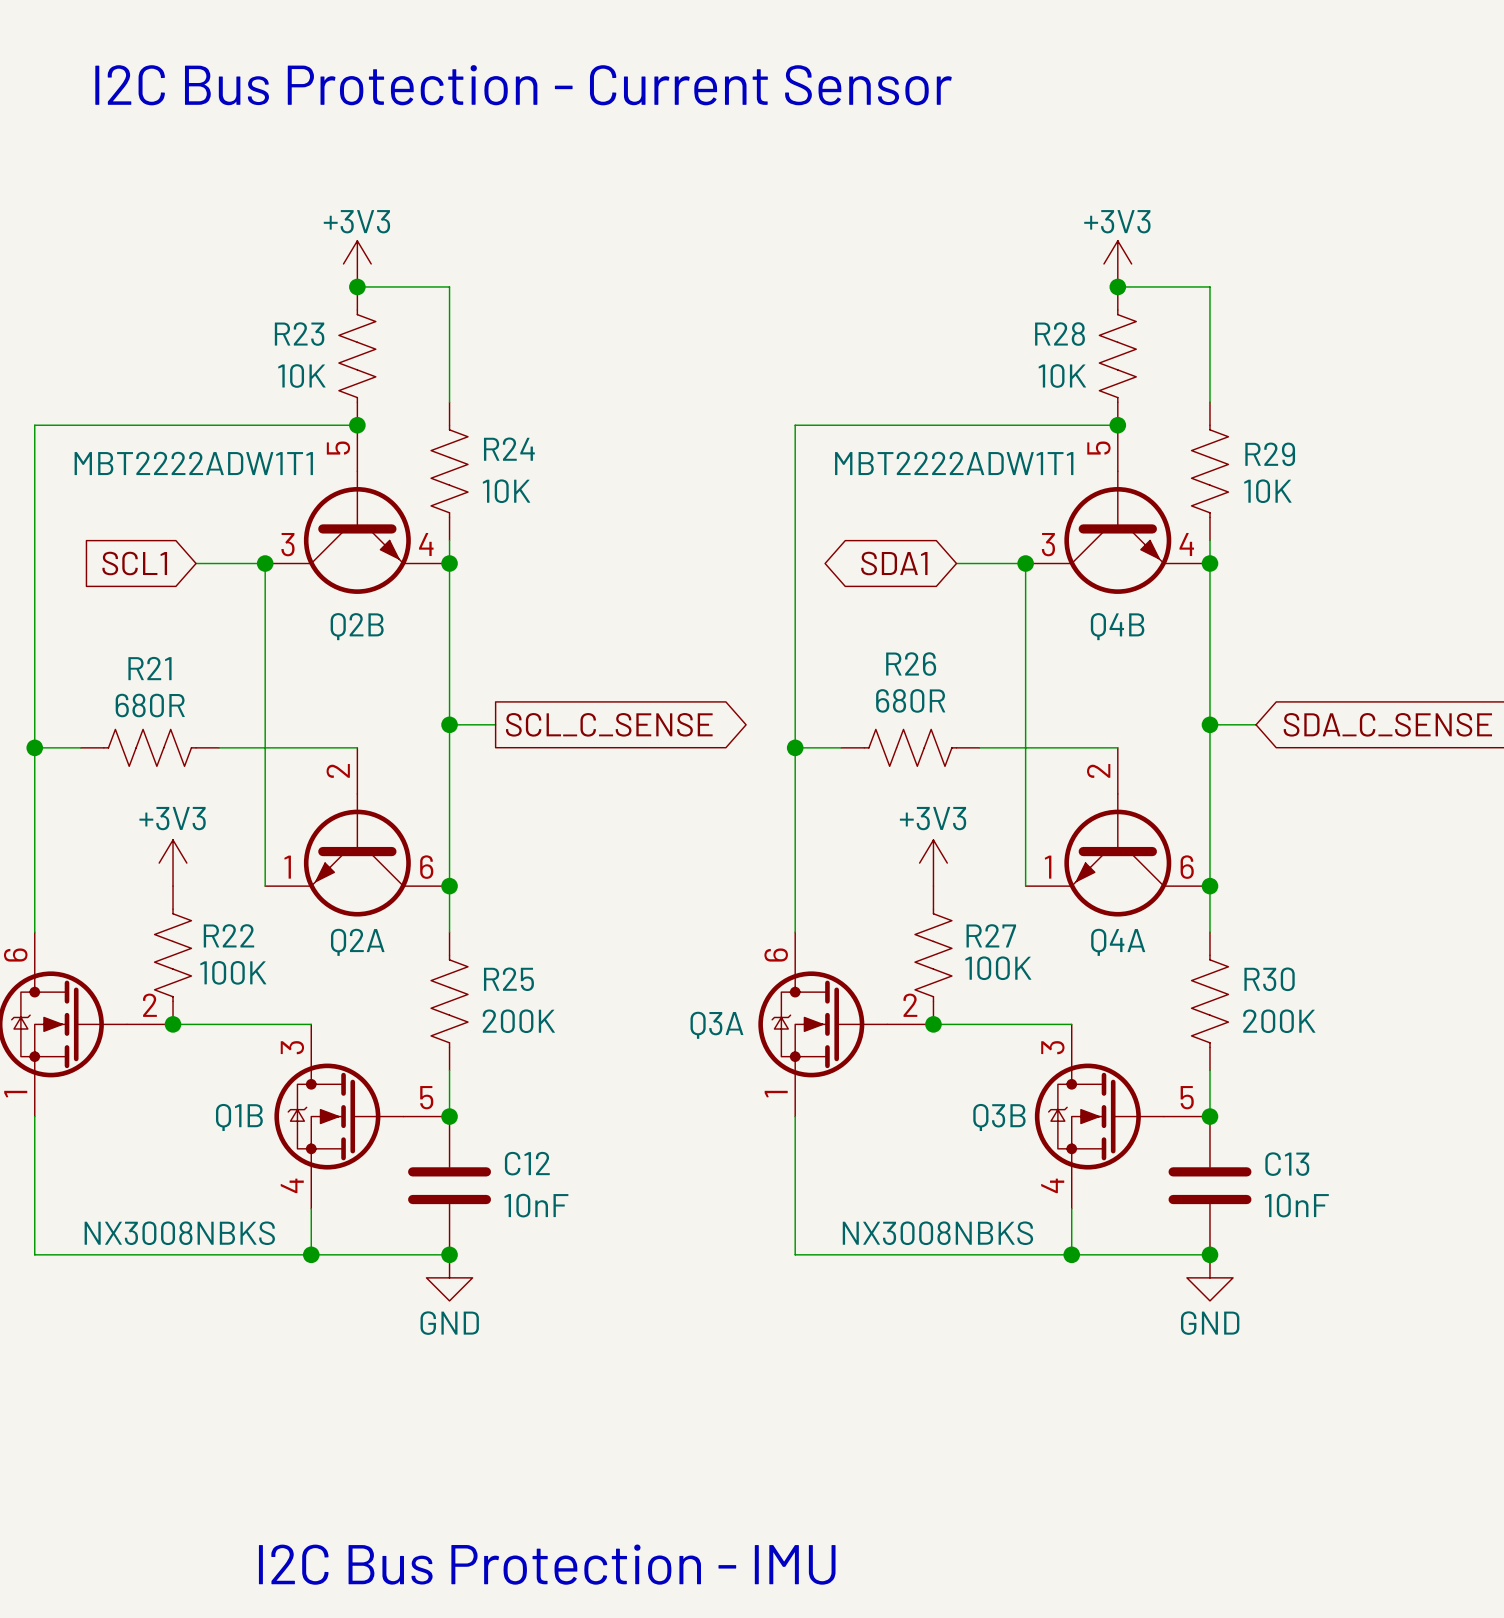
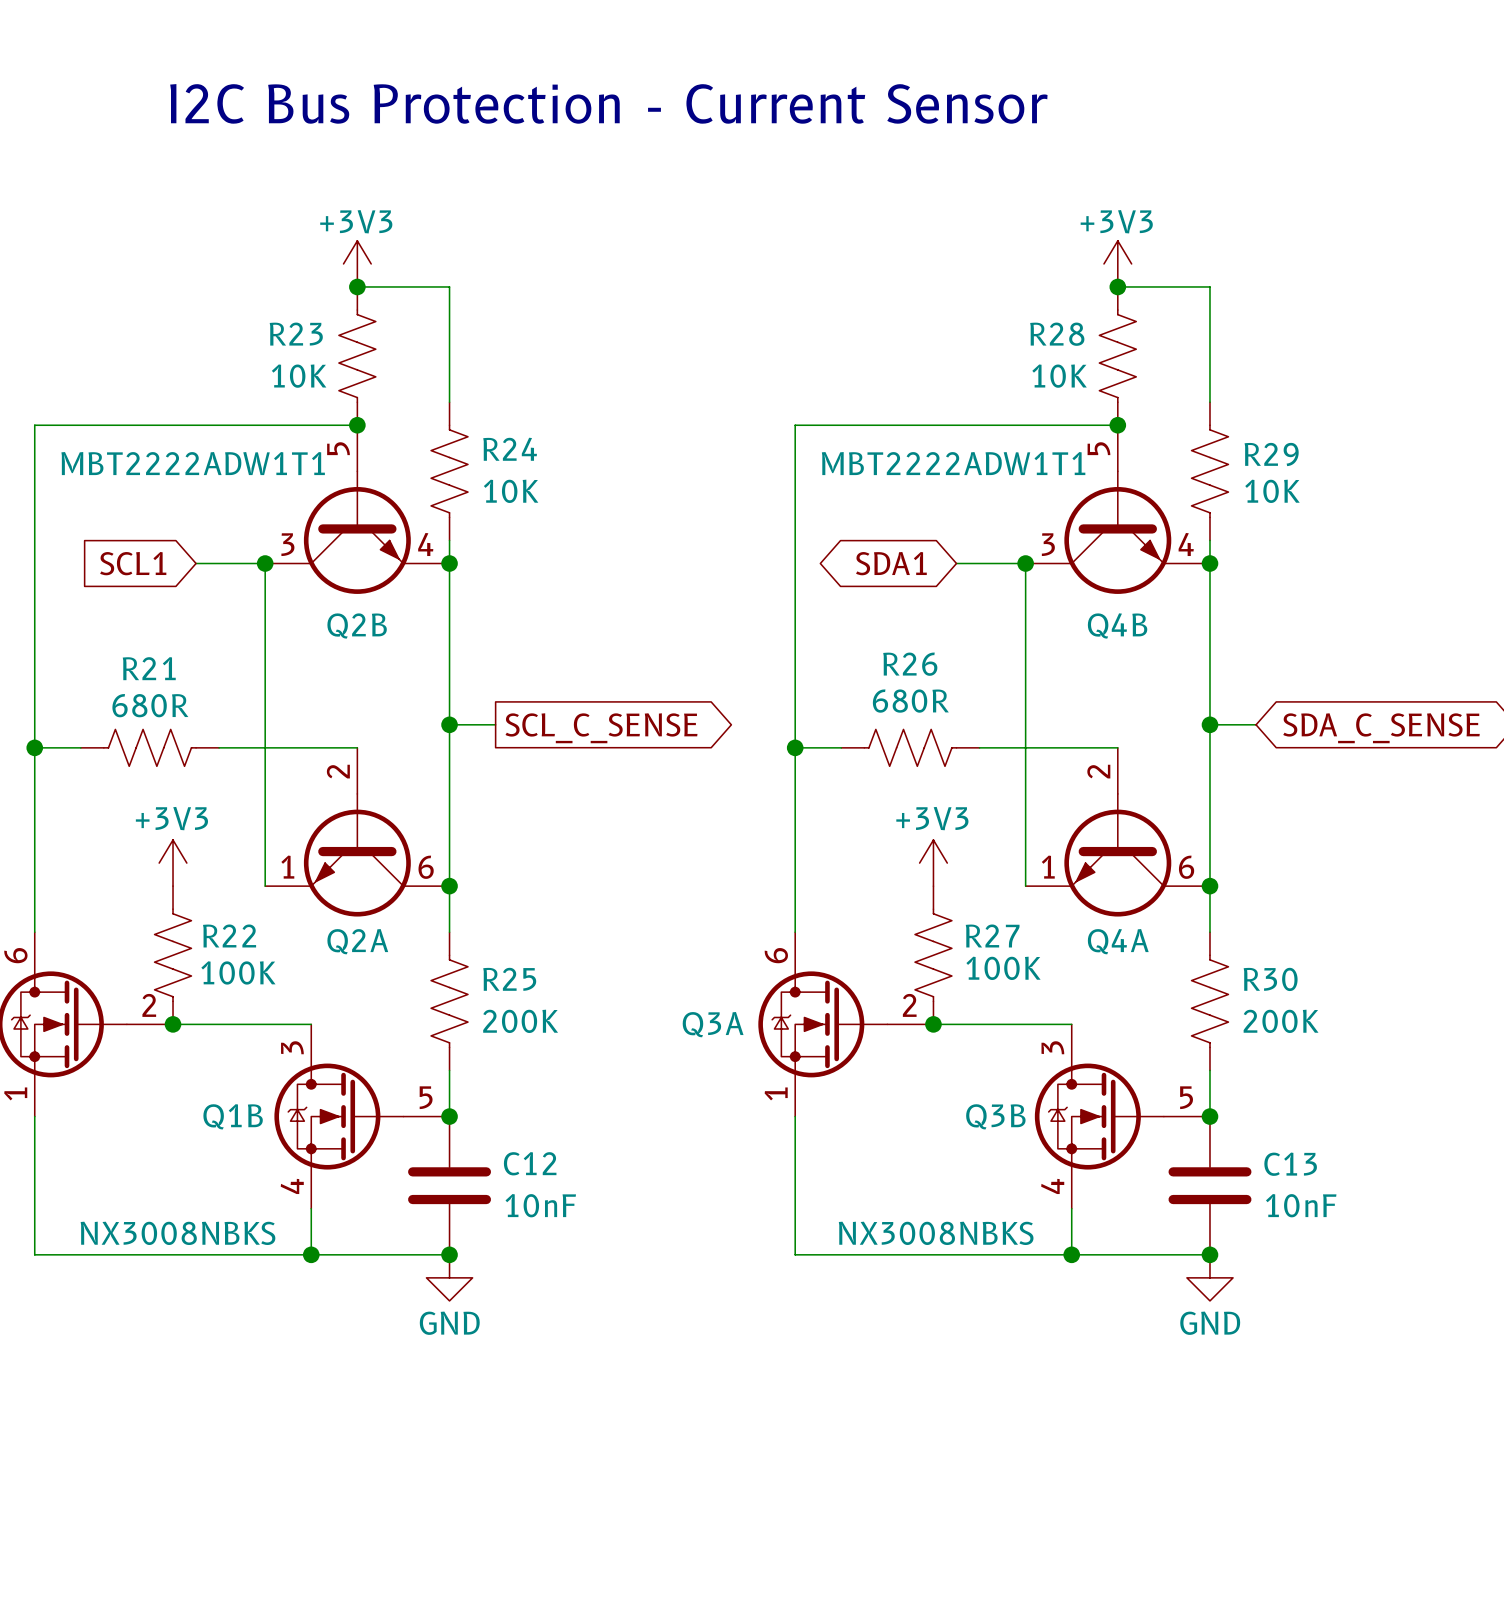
text position: I2C Bus Protection - Current Sensor (523, 85) -> I2C Bus Protection - Current Sensor (608, 103)
text: I2C Bus Protection - IMU (547, 1564) -> none

